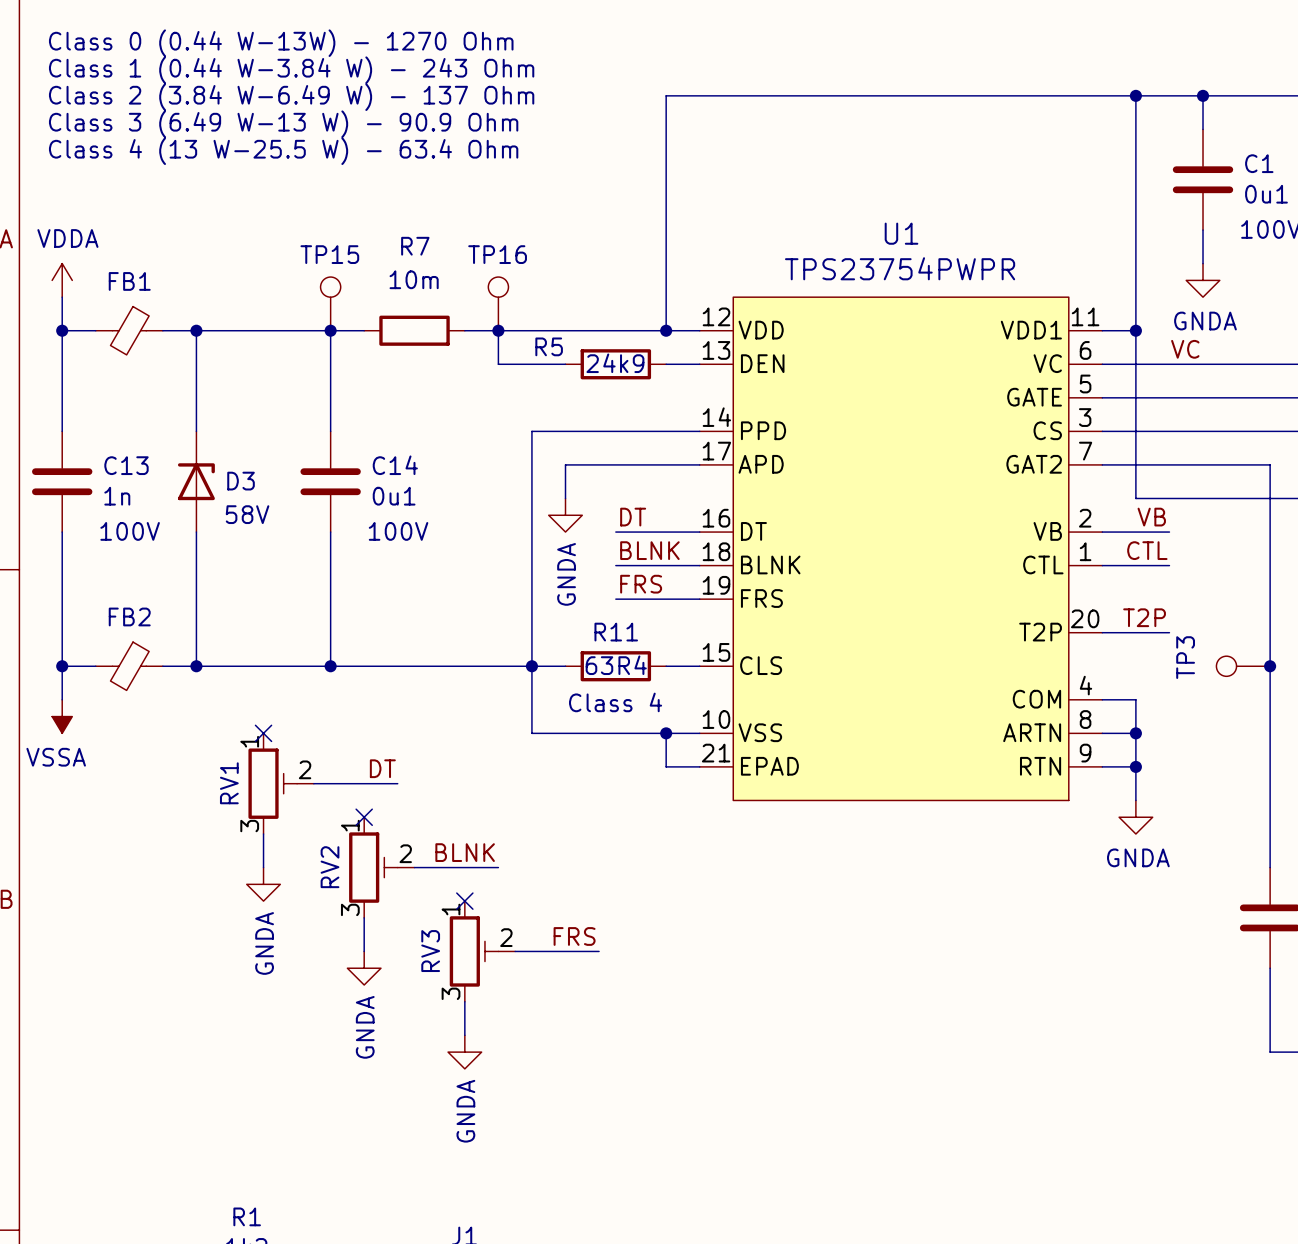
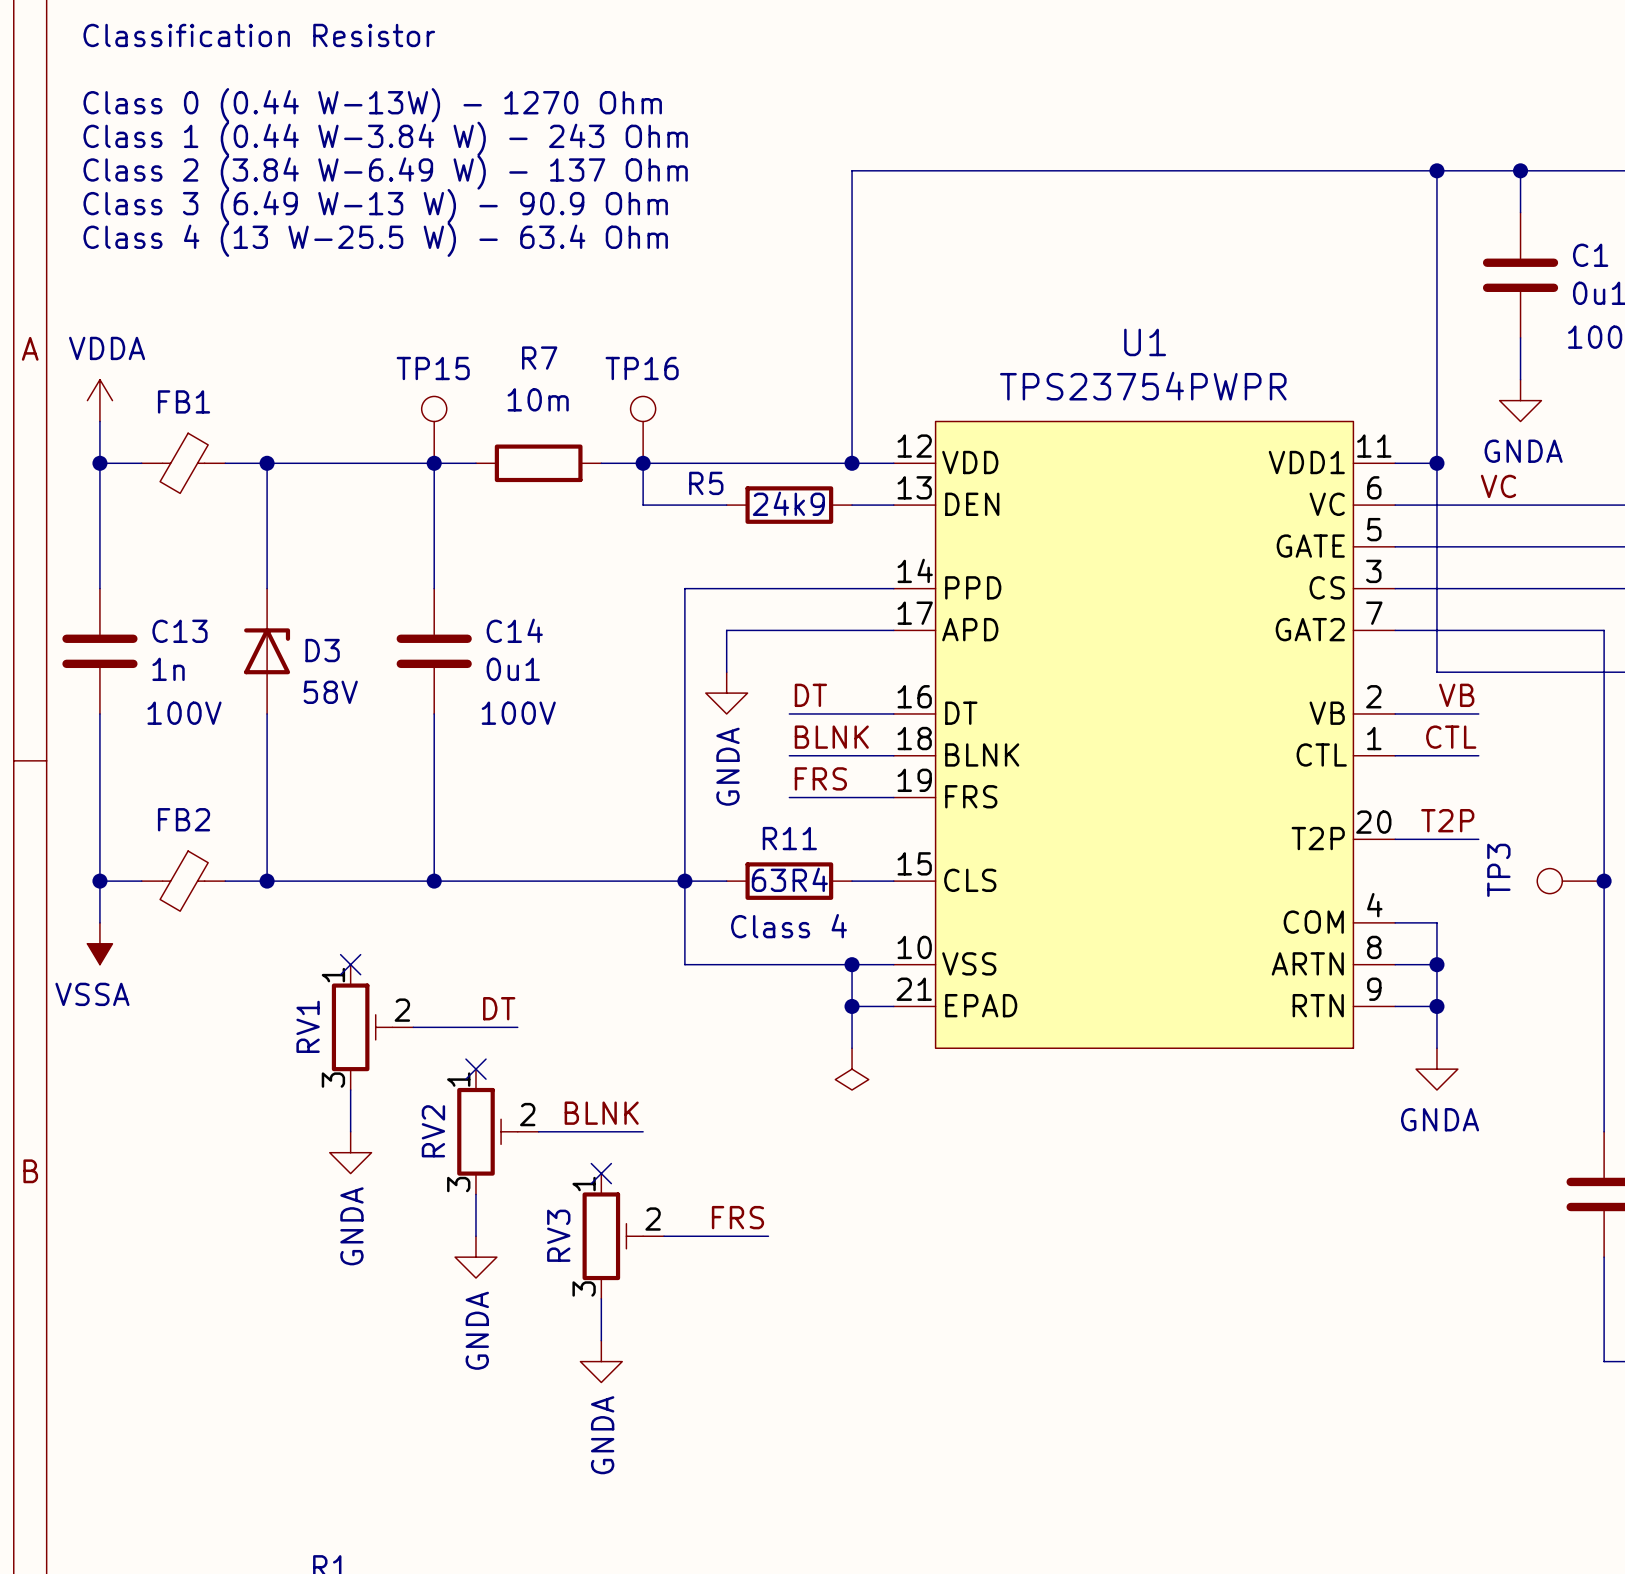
wire: none -> (852, 1006) (852, 1048)
junction: none -> (852, 1006)
power symbol: none -> (852, 1069)

